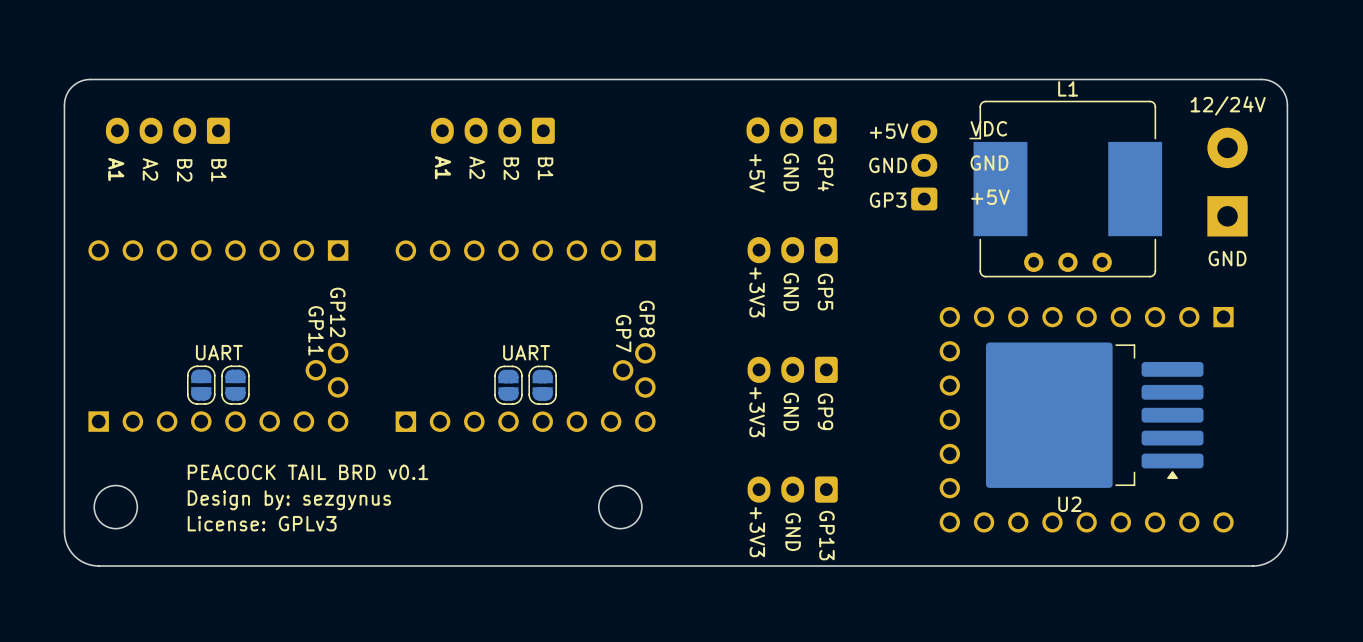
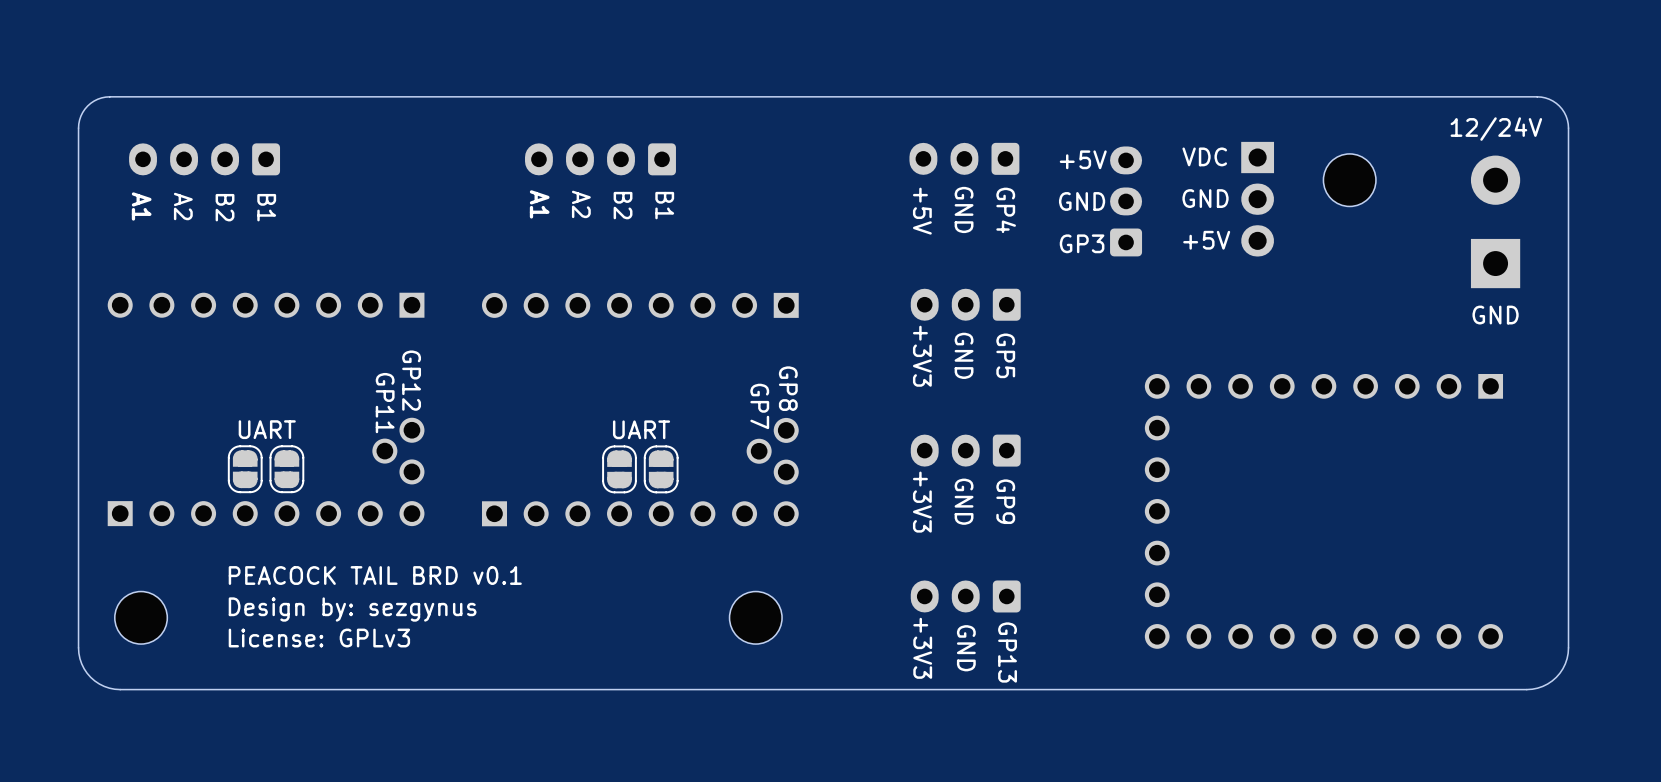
part: none -> (1349, 180)
part: none -> (1257, 199)
L1: (1065, 189) -> none
part: (1067, 262) -> none
U2: (1094, 415) -> none

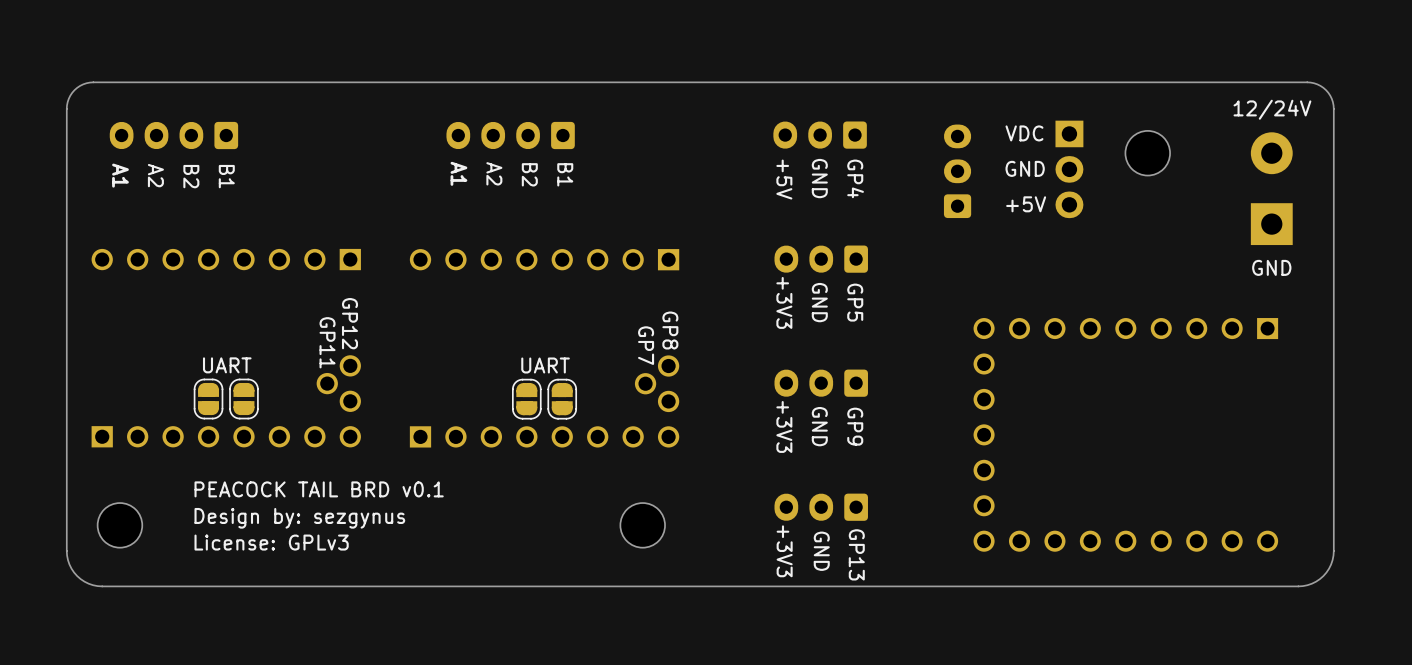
text: +5V (1083, 159) -> none
text: GND (1082, 201) -> none
text: GP3 (1082, 243) -> none

